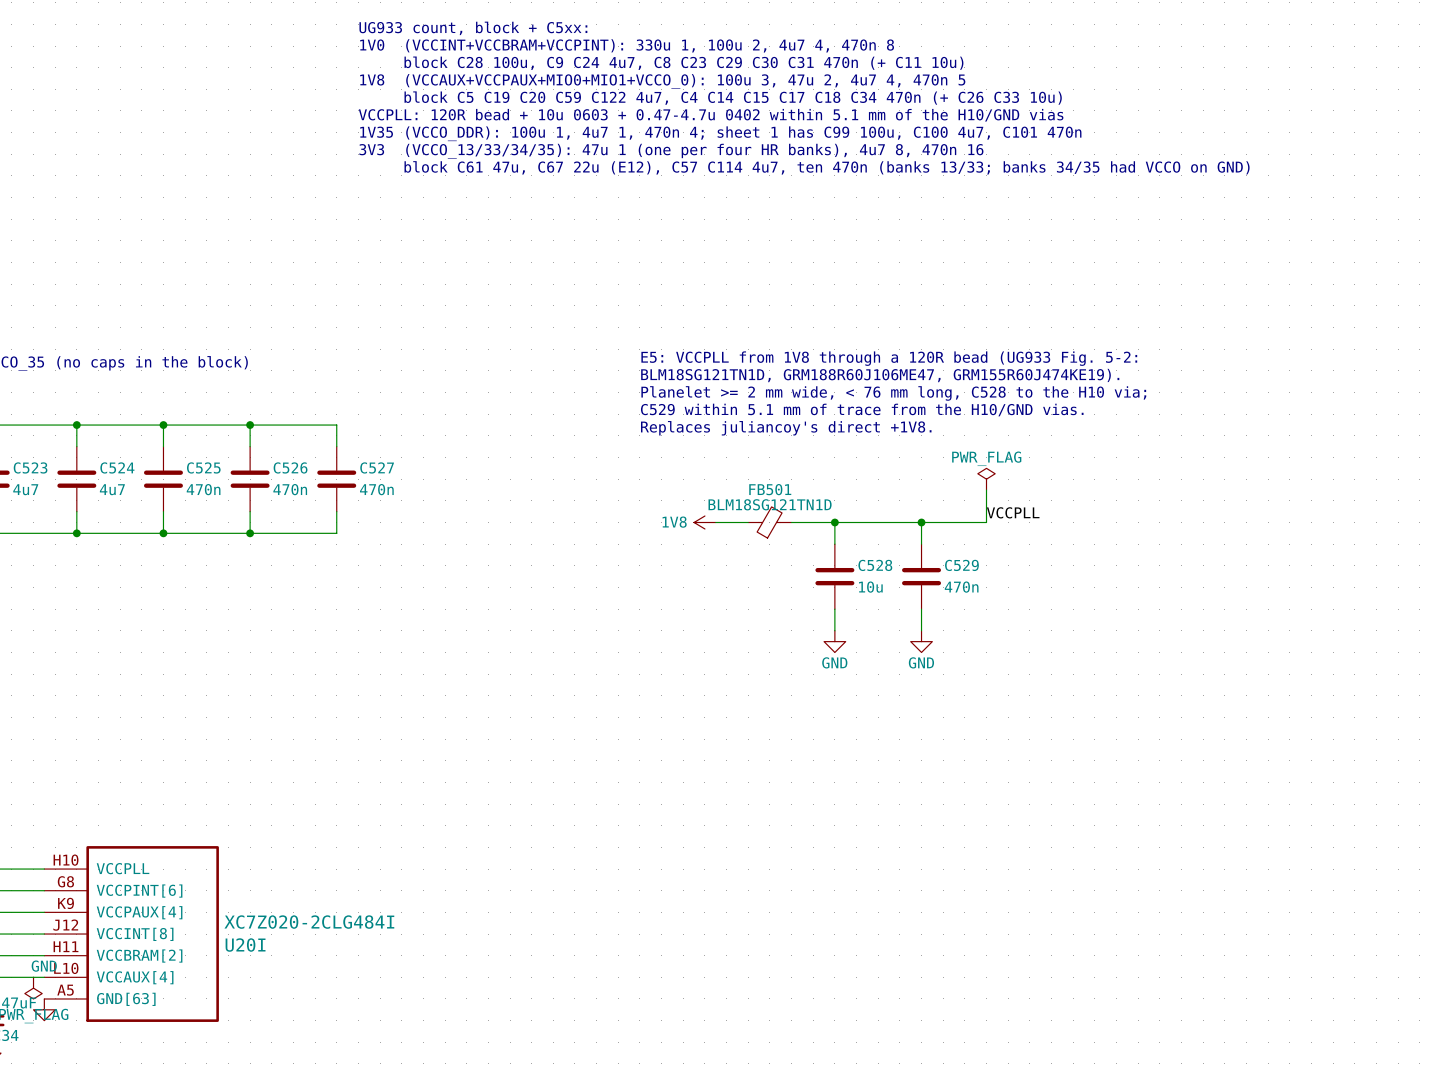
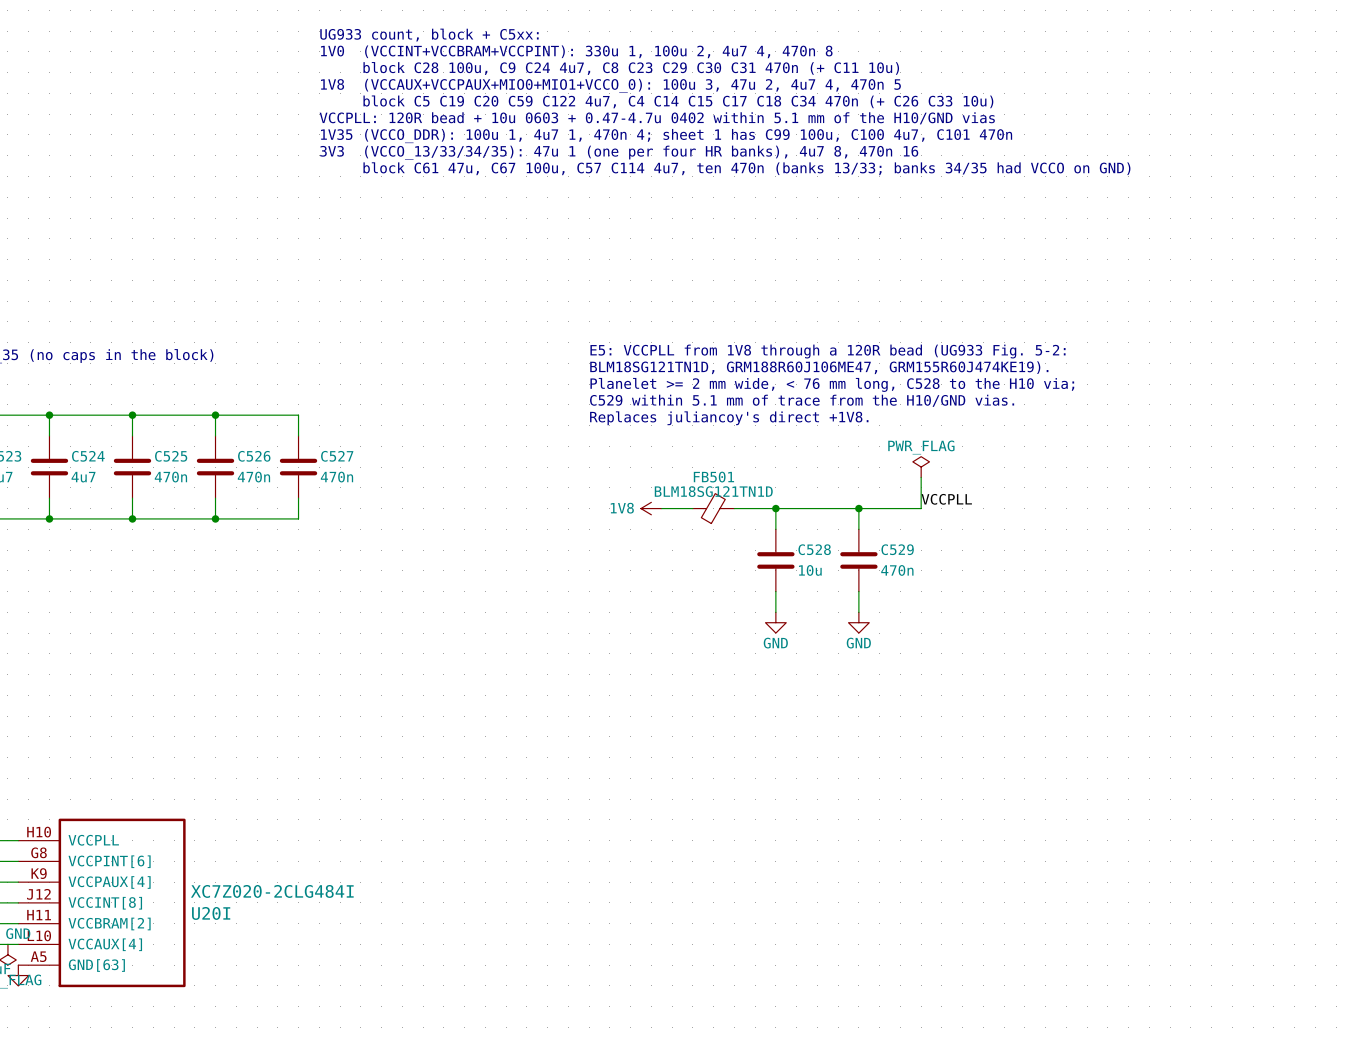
text: block C61 47u, C67 22u (E12), C57 C114 4u7, ten 470n (banks 13/33; banks 34/35 had VCCO on GND) (827, 167) -> block C61 47u, C67 100u, C57 C114 4u7, ten 470n (banks 13/33; banks 34/35 had VCCO on GND) (746, 168)

